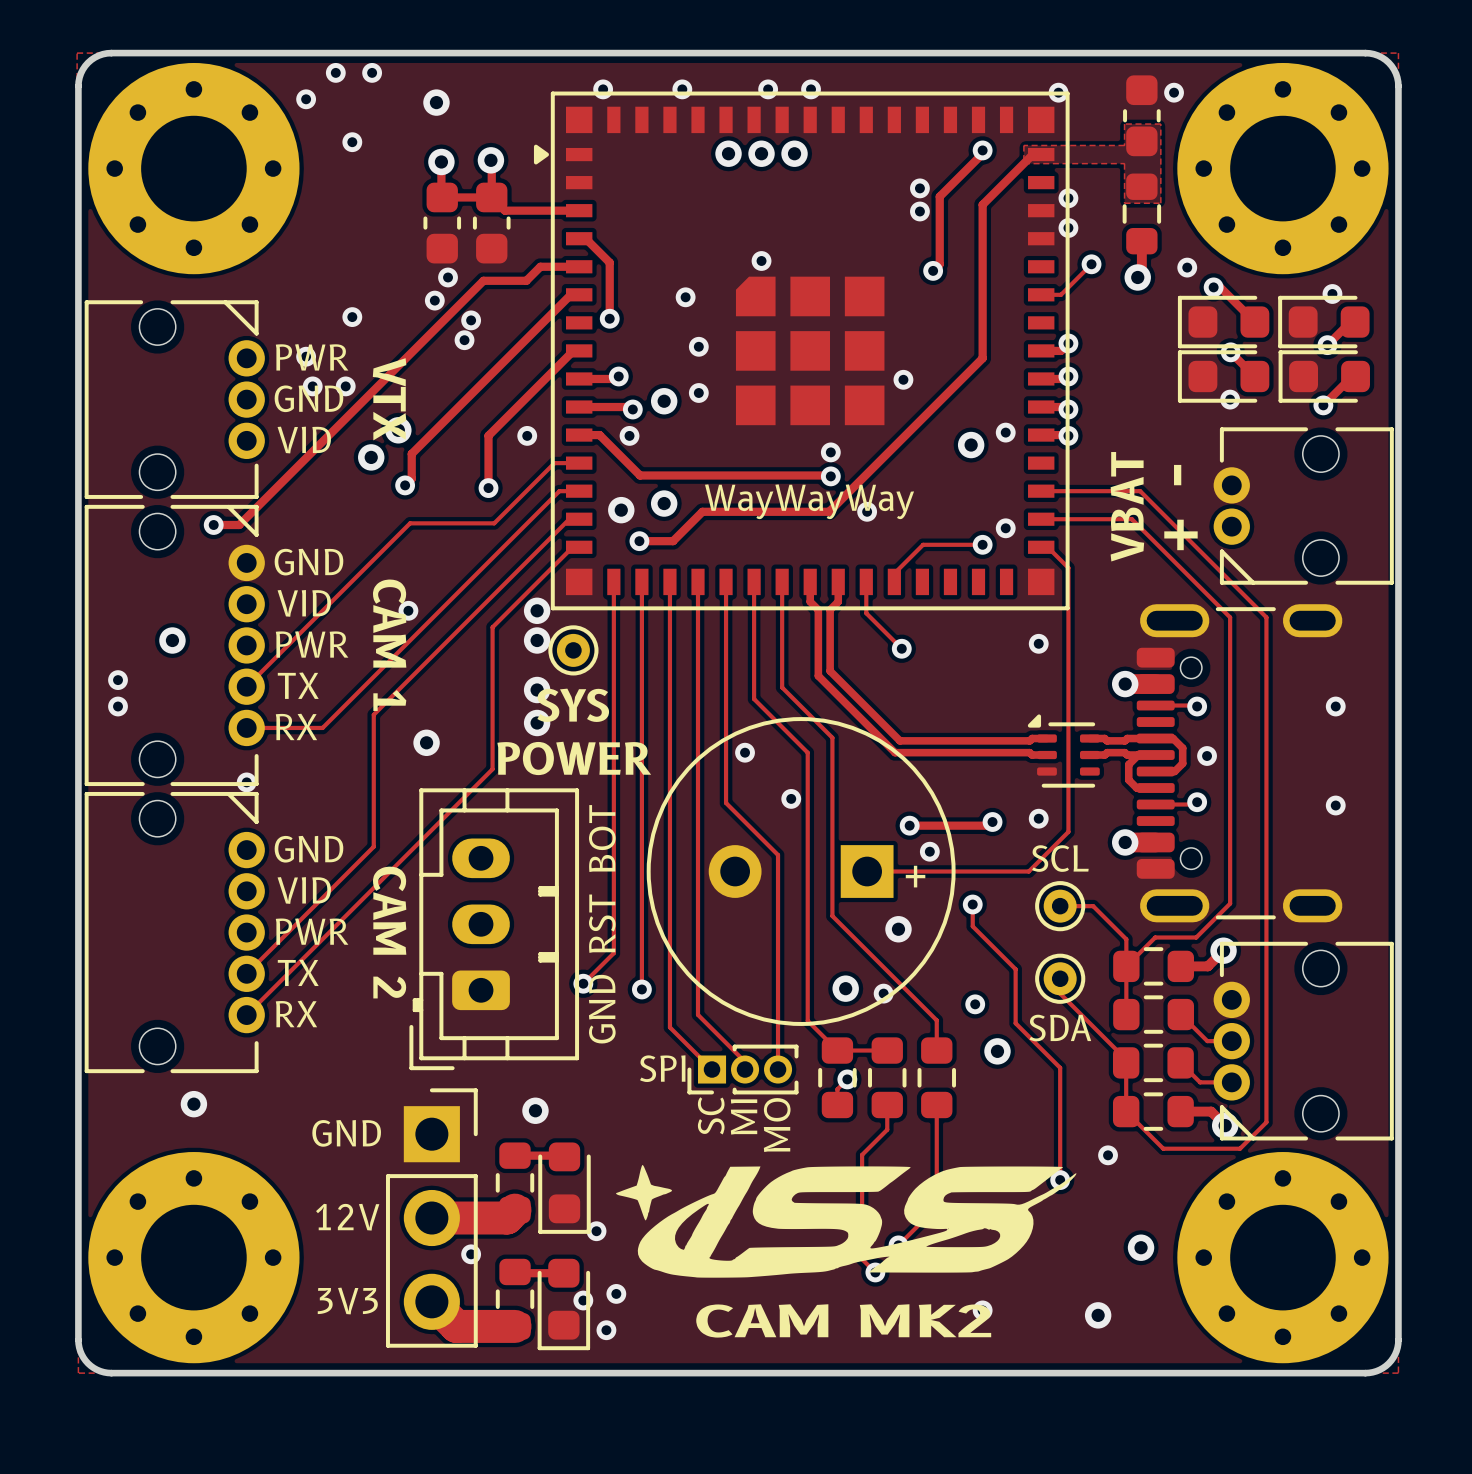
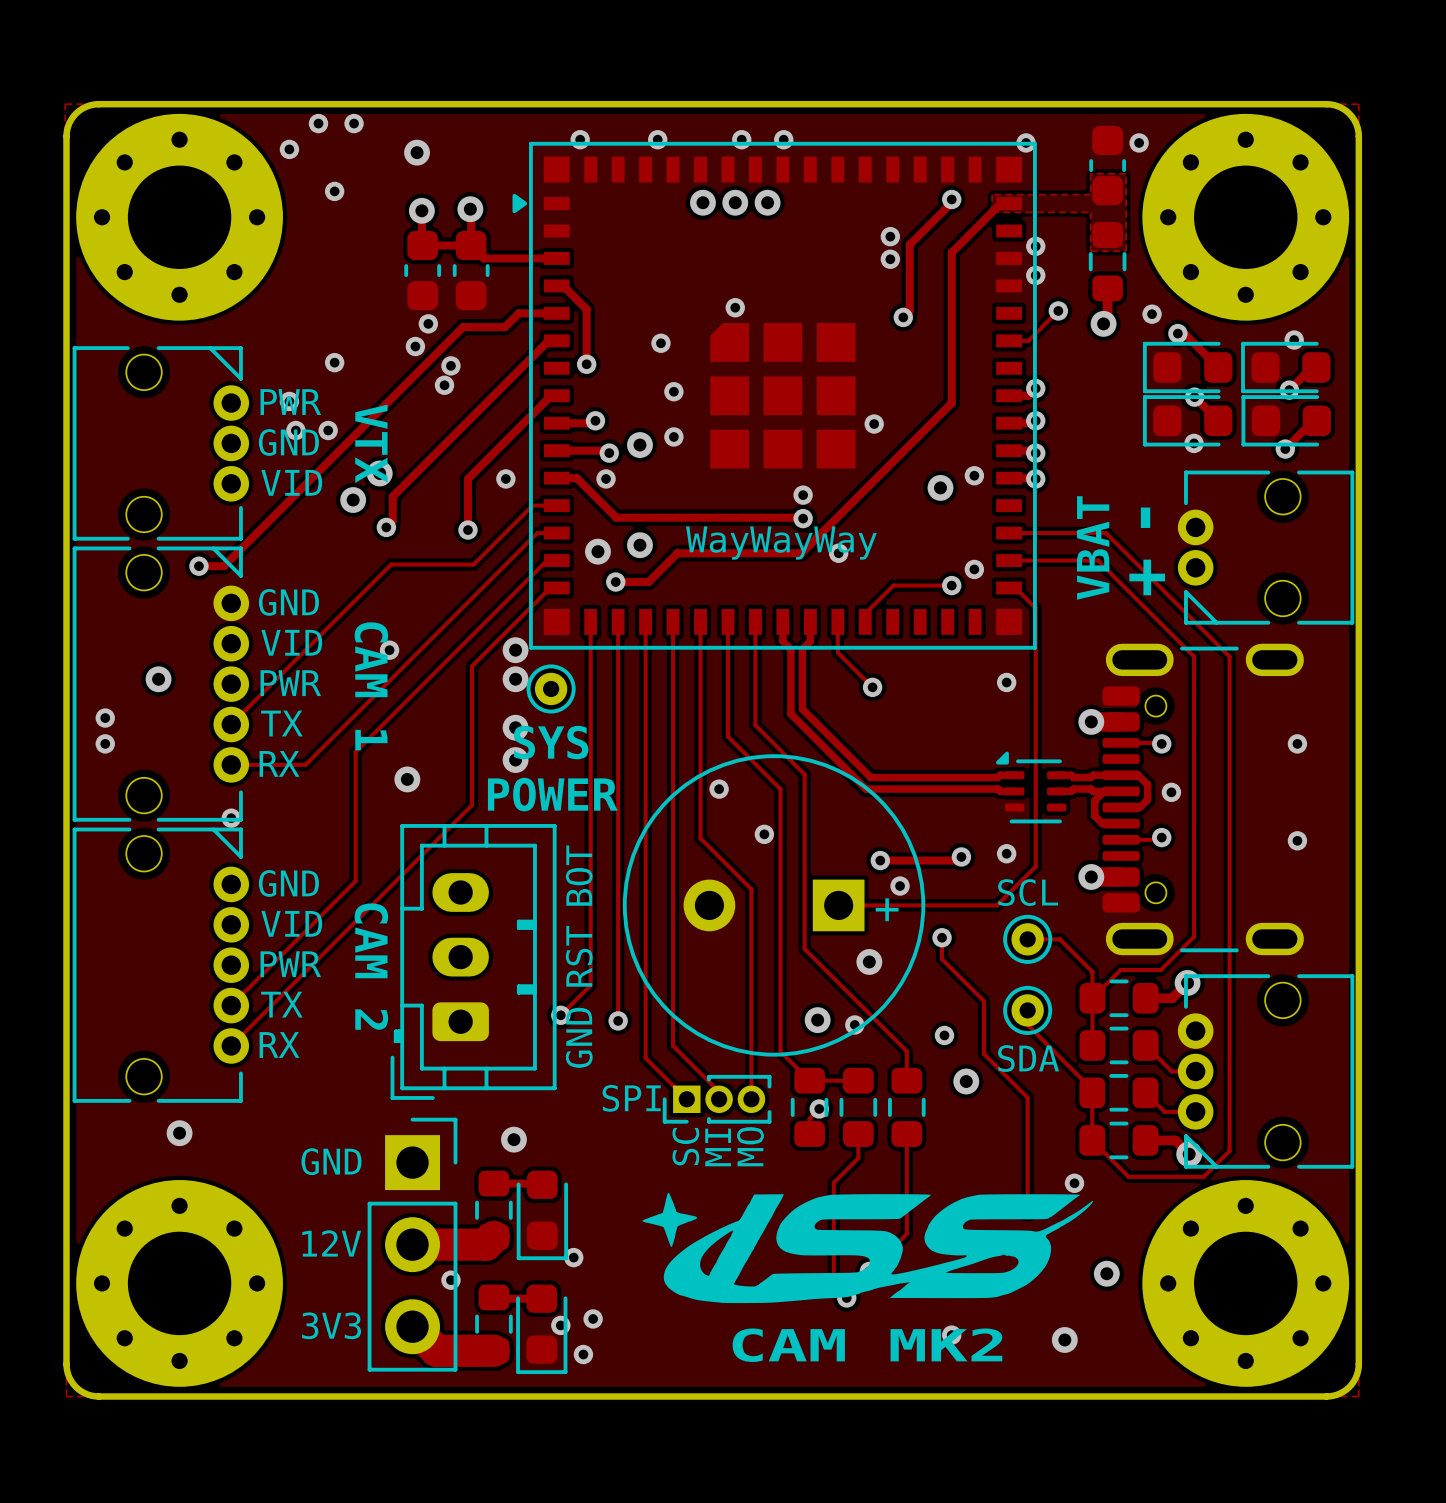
drawing position: (846, 1221) -> (867, 1247)
text position: CAM MK2 (843, 1320) -> CAM MK2 (867, 1345)

